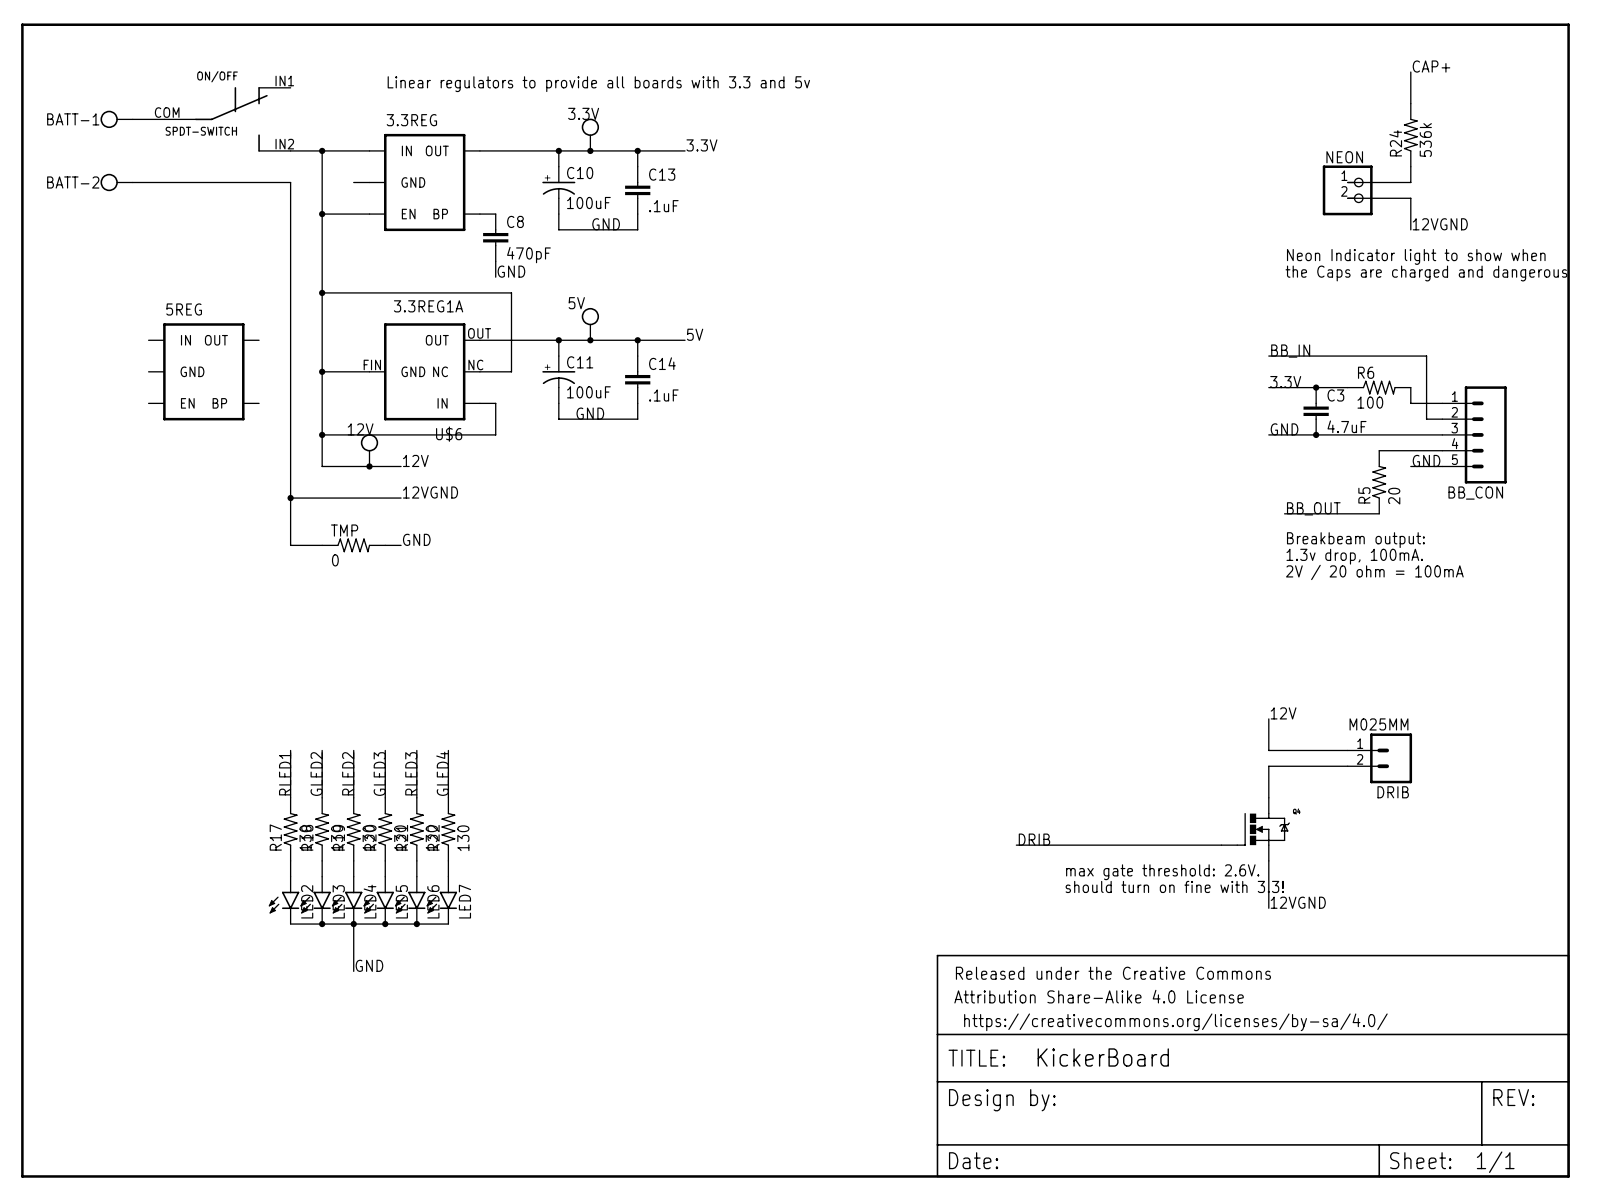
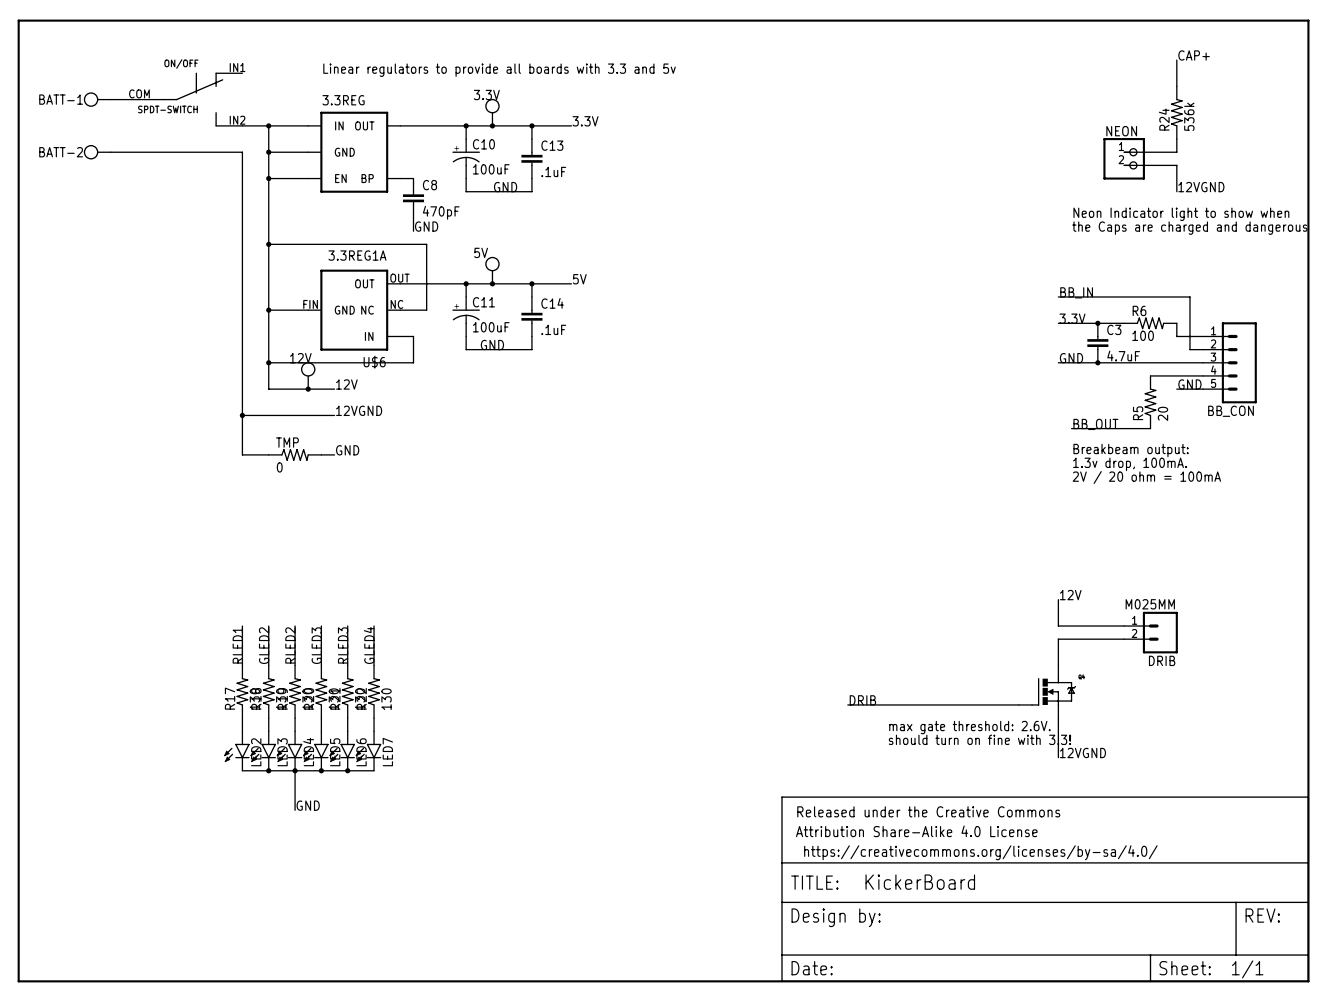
wire: none -> (268, 152) (295, 152)
junction: none -> (268, 152)
5REG: (203, 371) -> none

